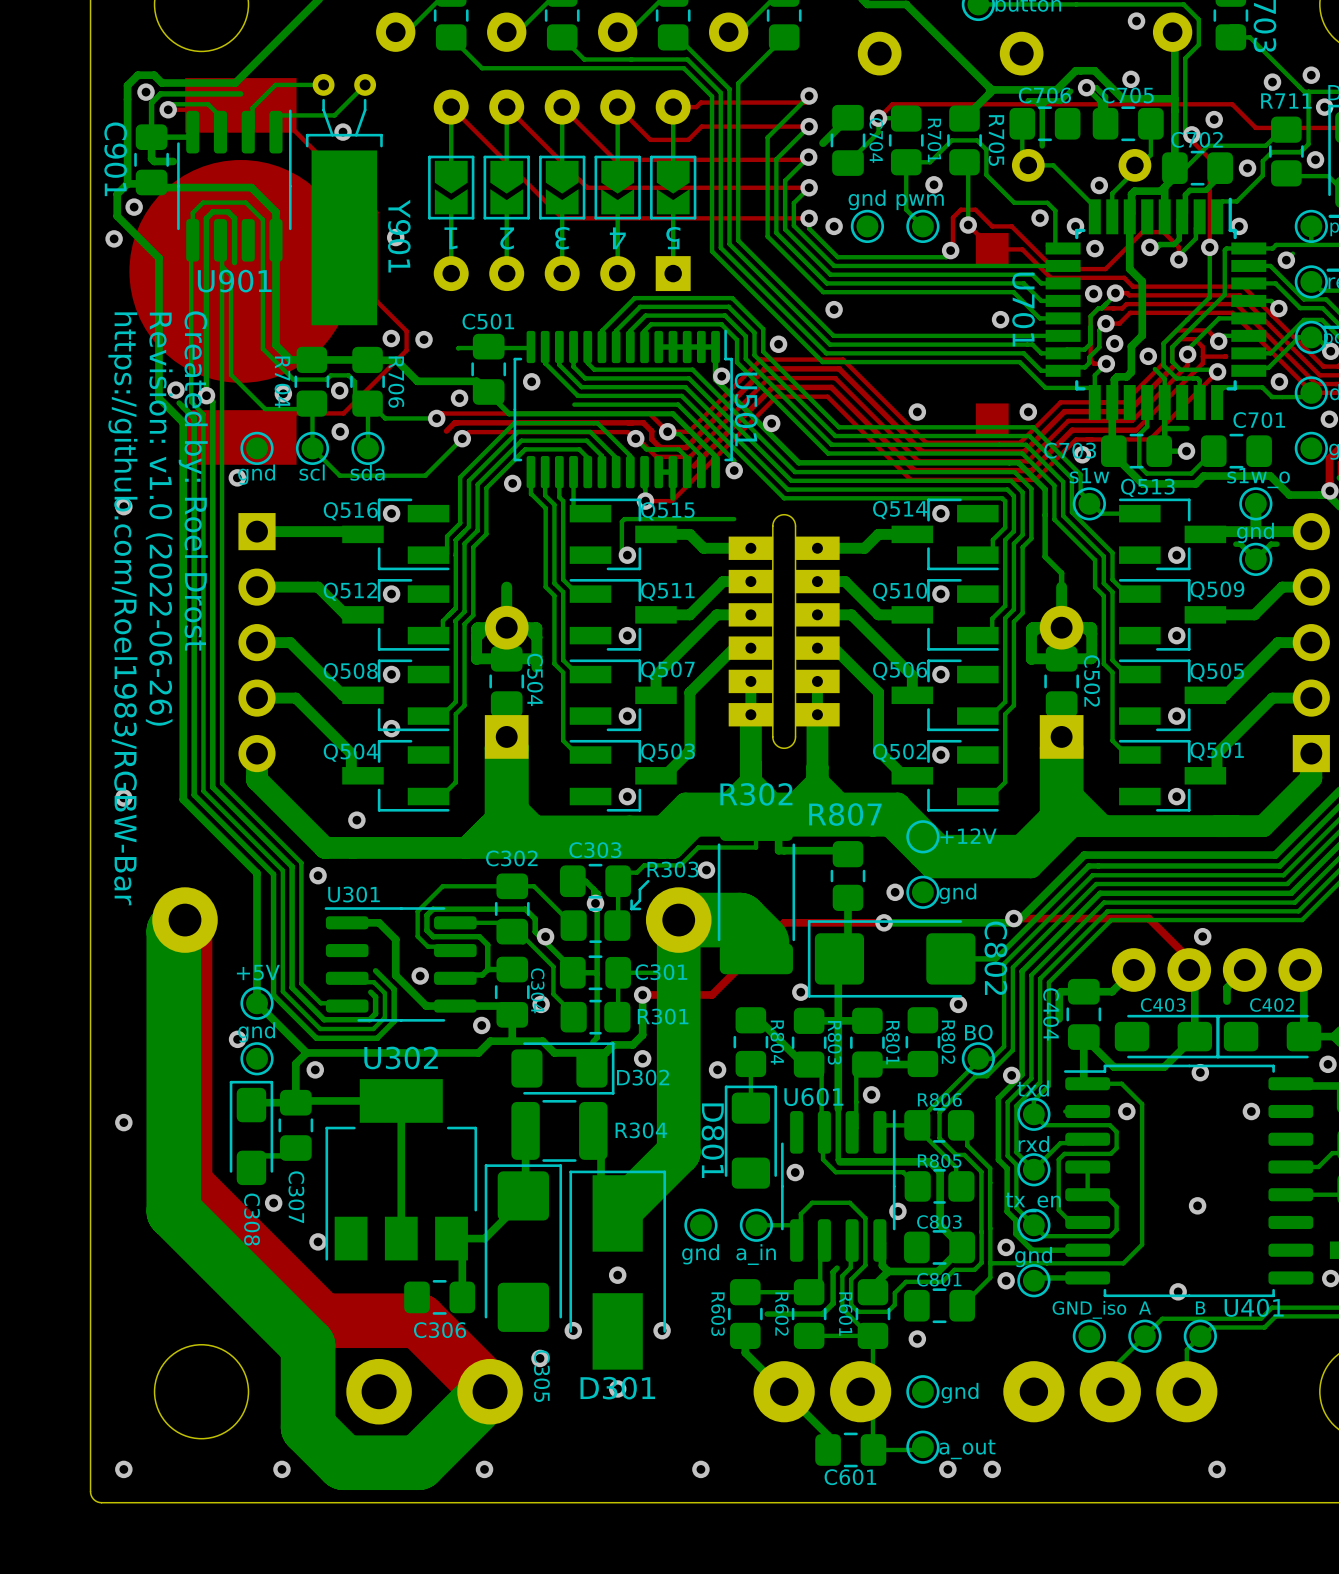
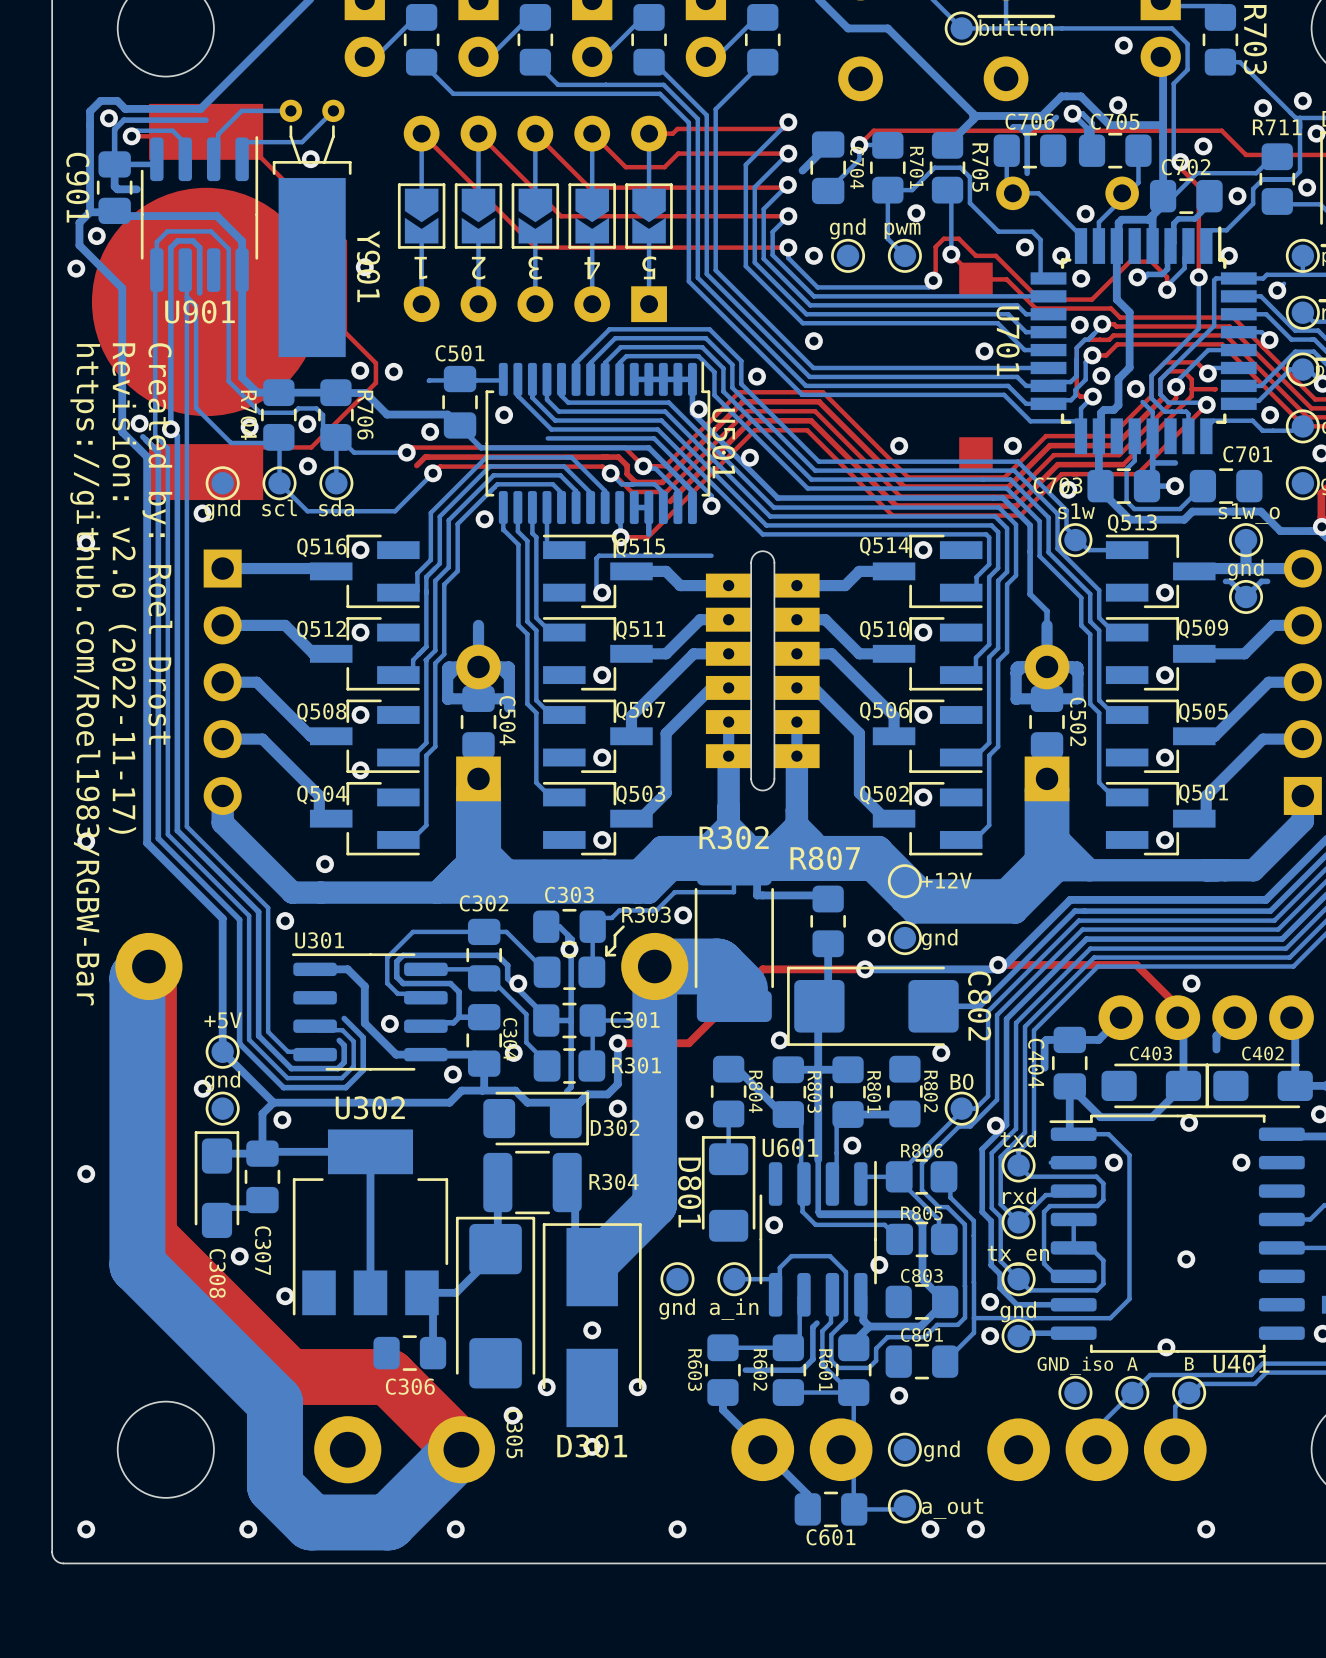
text: Revision: v1.0 (2022-06-26) (159, 519) -> Revision: v2.0 (2022-11-17) (122, 588)

